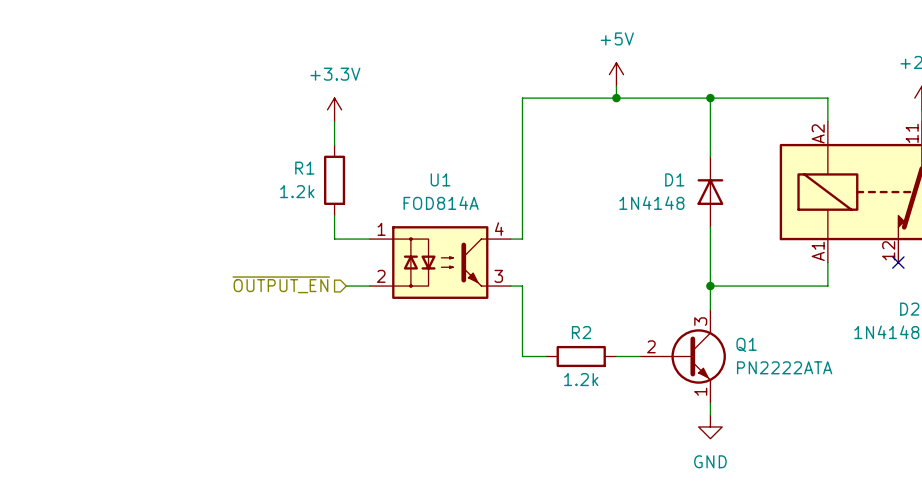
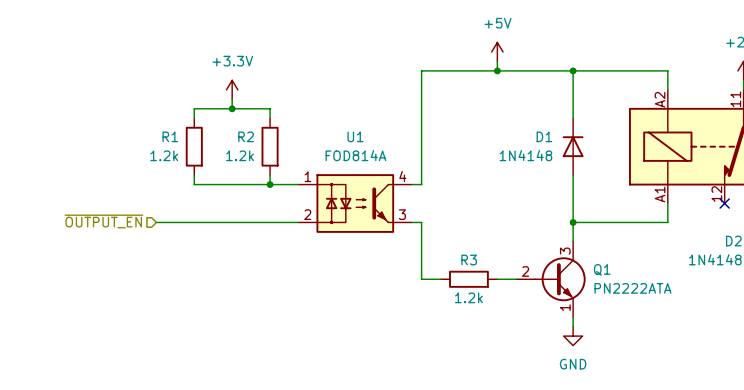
power symbol position: +3.3V (334, 109) -> +3.3V (232, 89)
wire: (334, 121) (334, 145) -> none
junction: none -> (232, 108)
wire: none -> (194, 118) (194, 108) (270, 108) (270, 118)
R1 position: (334, 180) -> (194, 146)
R2: none -> 1.2k (270, 146)
wire: none -> (194, 175) (194, 184) (270, 184)
junction: none -> (270, 184)
hierarchical label position: ~{OUTPUT_EN} (281, 284) -> ~{OUTPUT_EN} (103, 221)
wire: none -> (156, 222) (279, 222)
R2 name: R2 (581, 332) -> R3 (469, 259)

